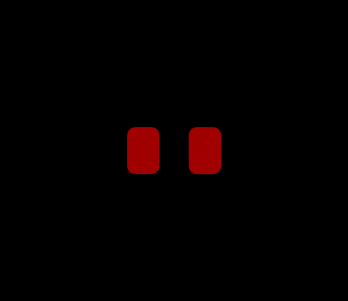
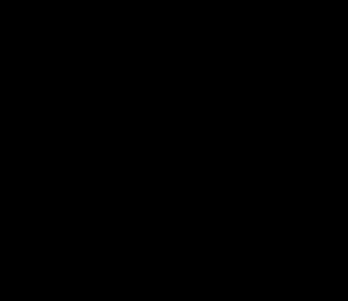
part: (174, 150) -> none

